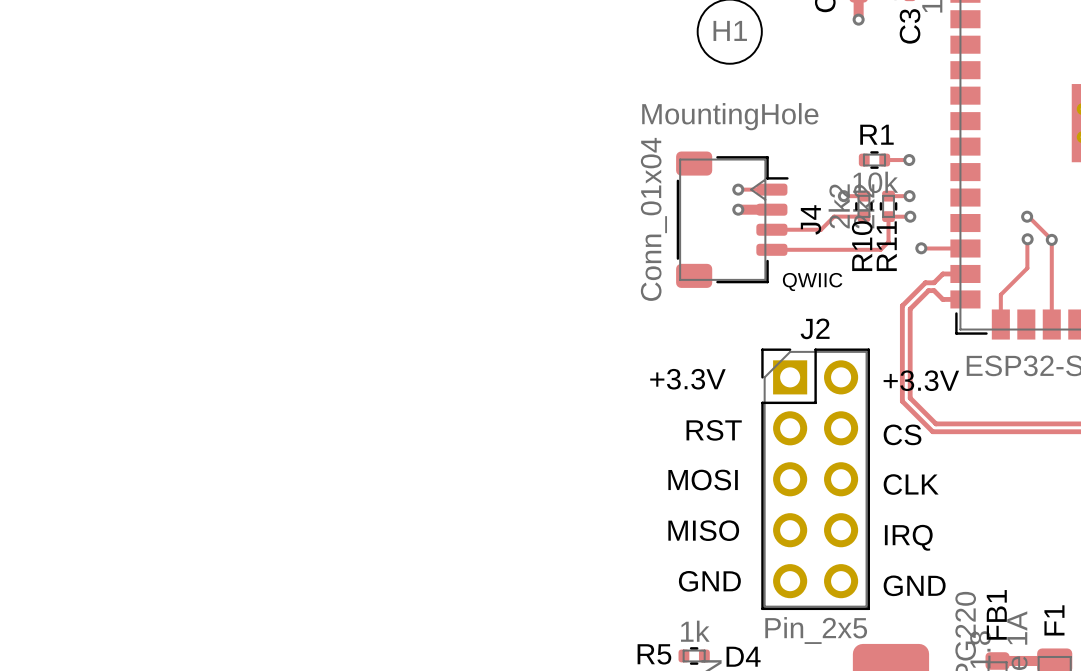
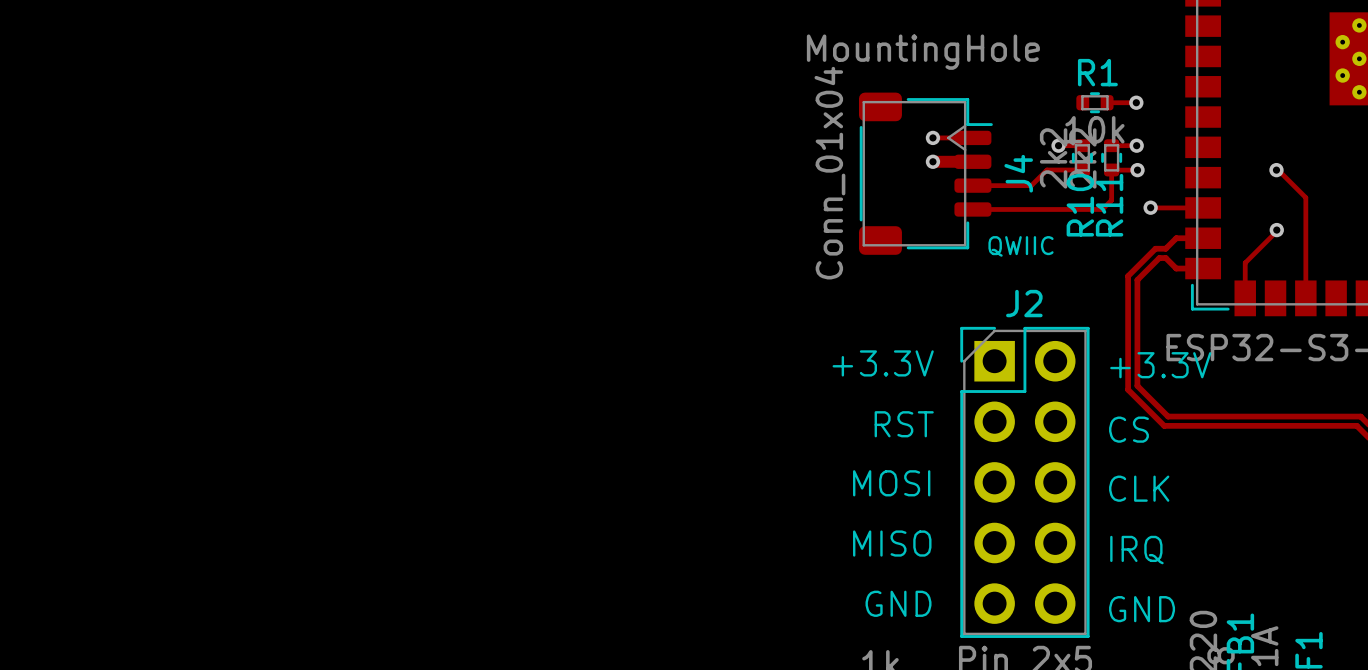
track: (1027, 239) (1027, 267) -> none
via: (1027, 239) -> none
via: (1051, 239) -> none
via: none -> (1276, 230)

